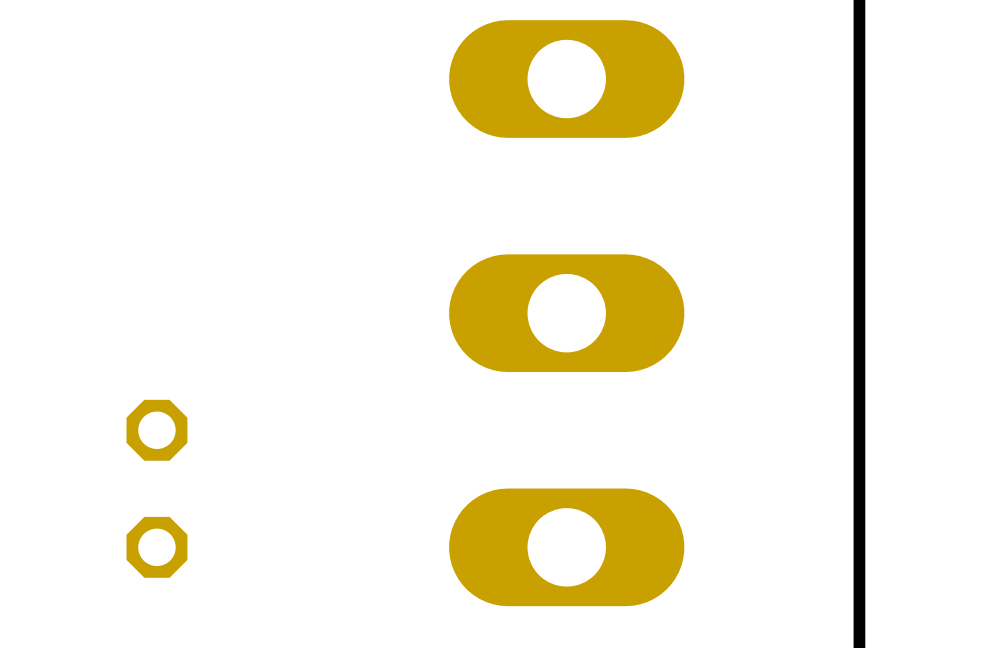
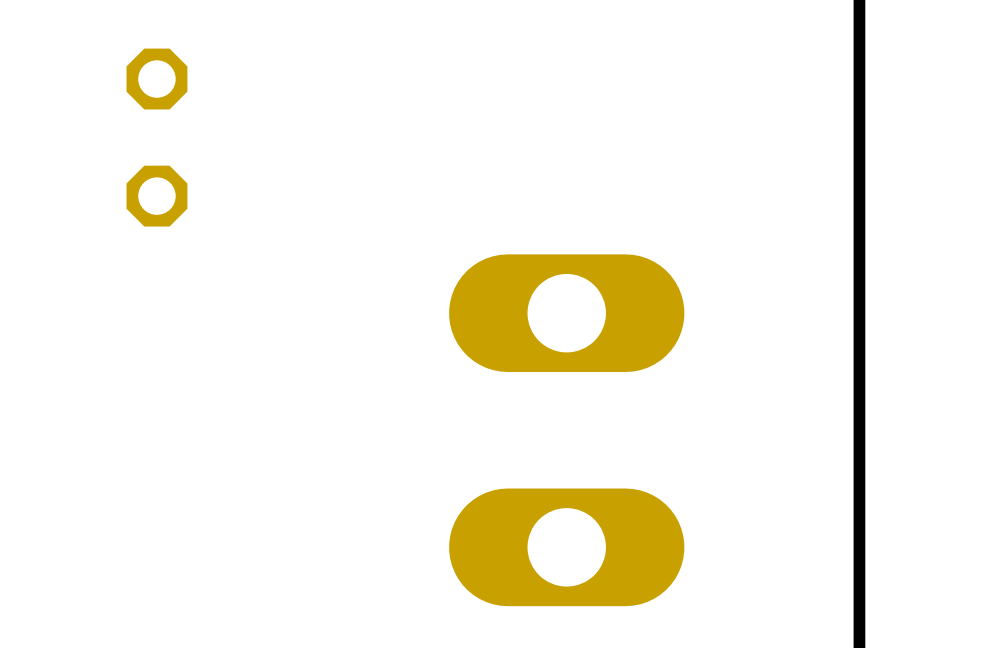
part: (566, 79) -> none
part position: (156, 488) -> (156, 137)

